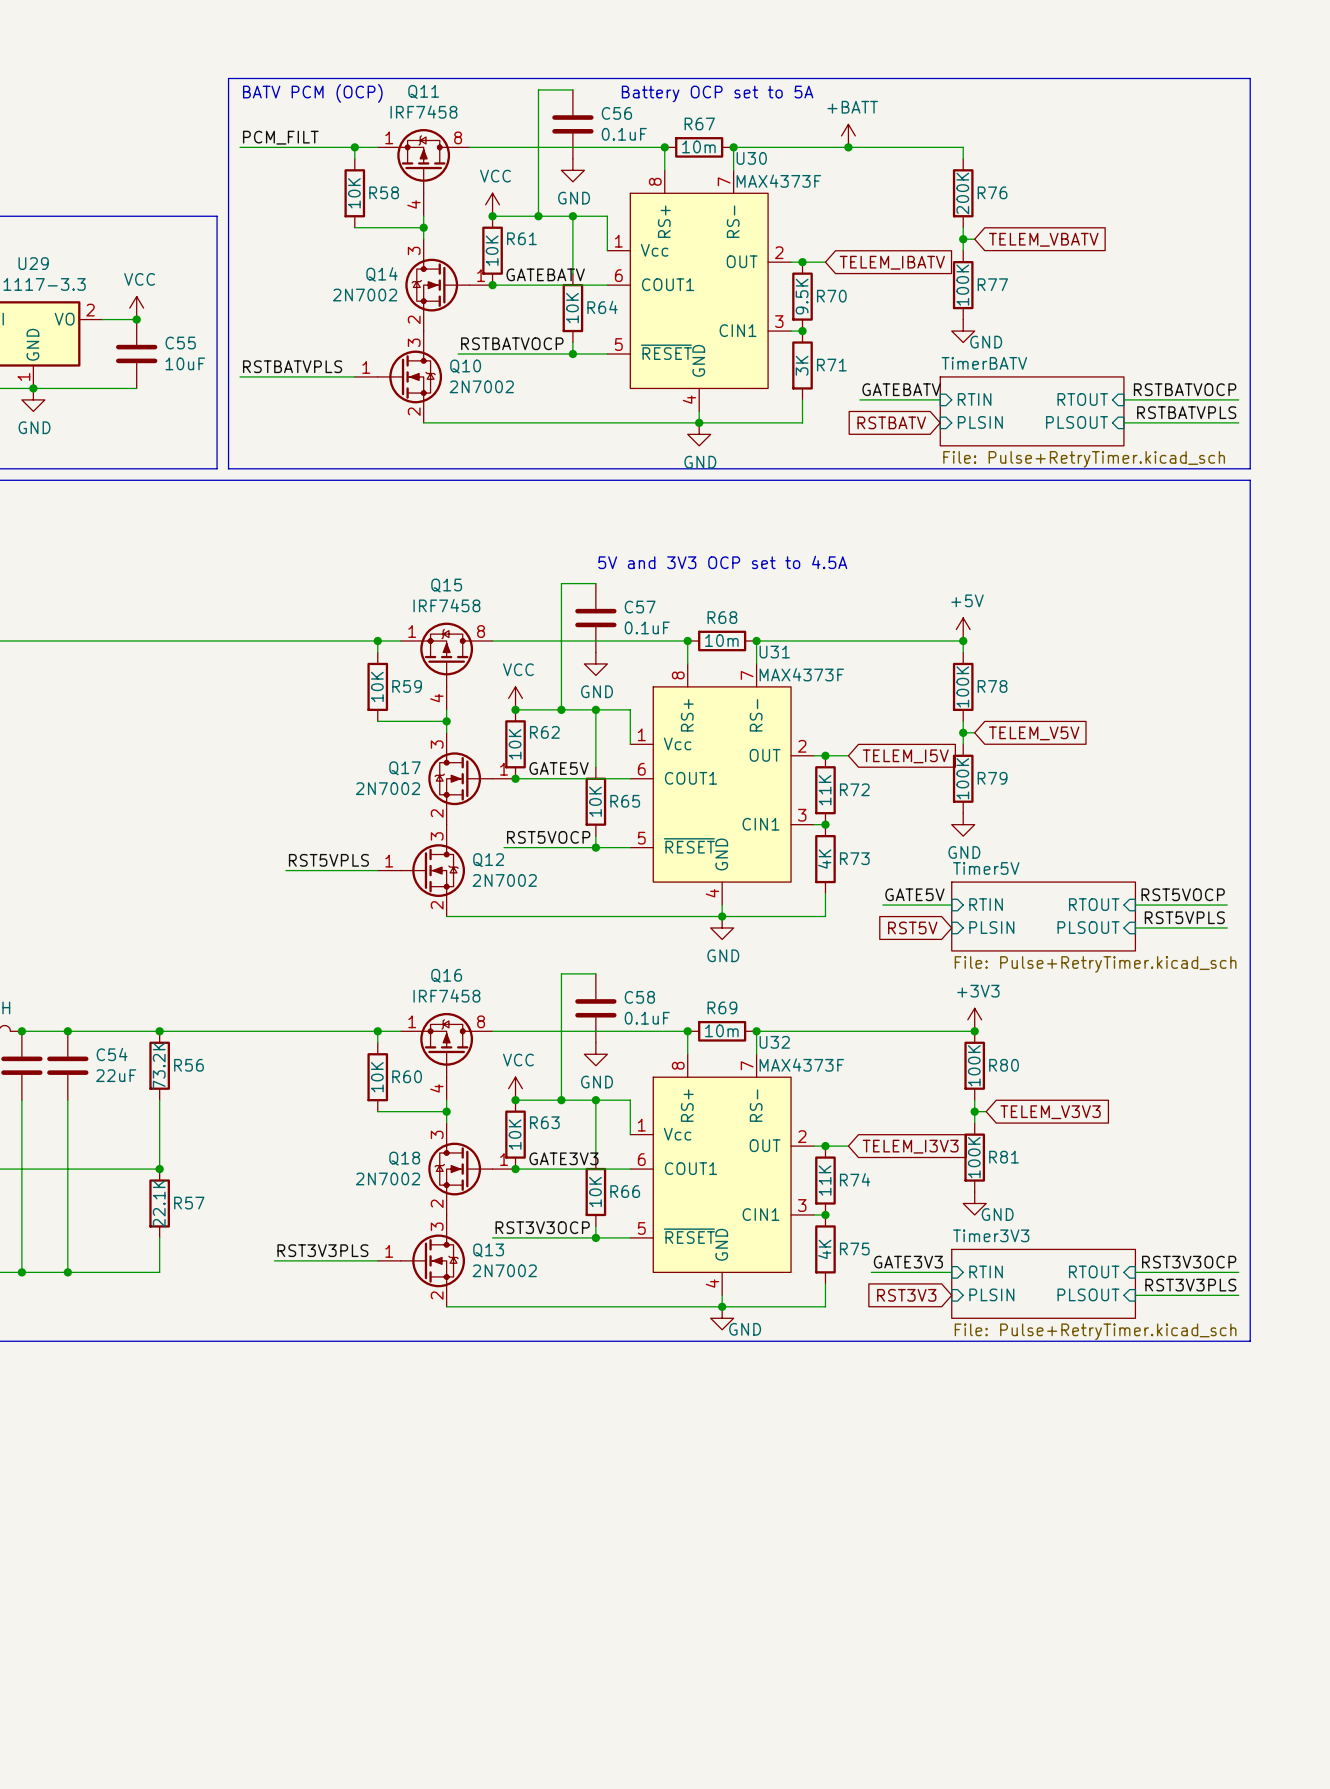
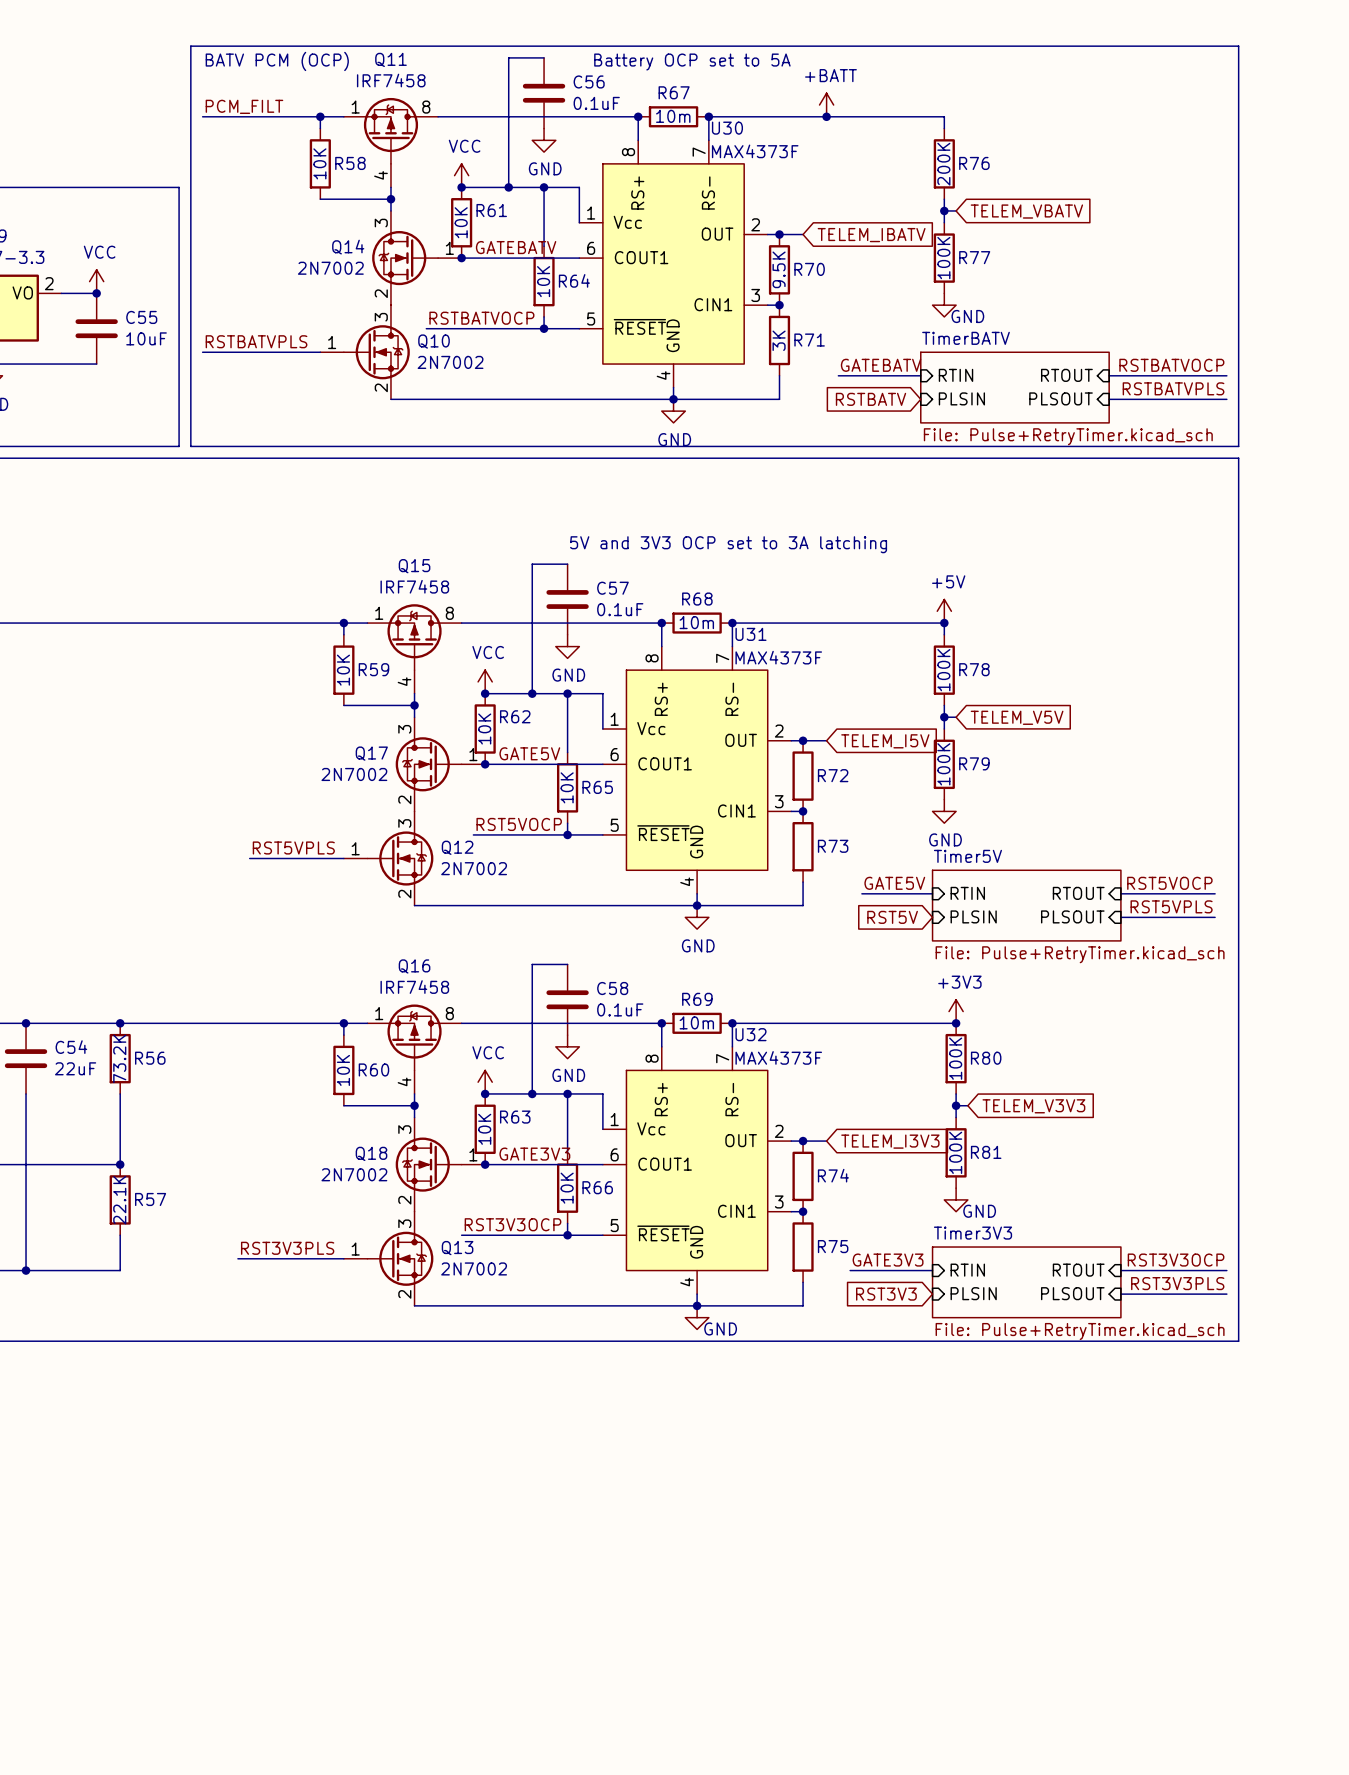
text: 5V and 3V3 OCP set to 4.5A (722, 562) -> 5V and 3V3 OCP set to 3A latching (728, 544)
R72 value: 11K (825, 790) -> none
R73 value: 4K (824, 859) -> none
R74 value: 11K (825, 1180) -> none
R75 value: 4K (824, 1249) -> none

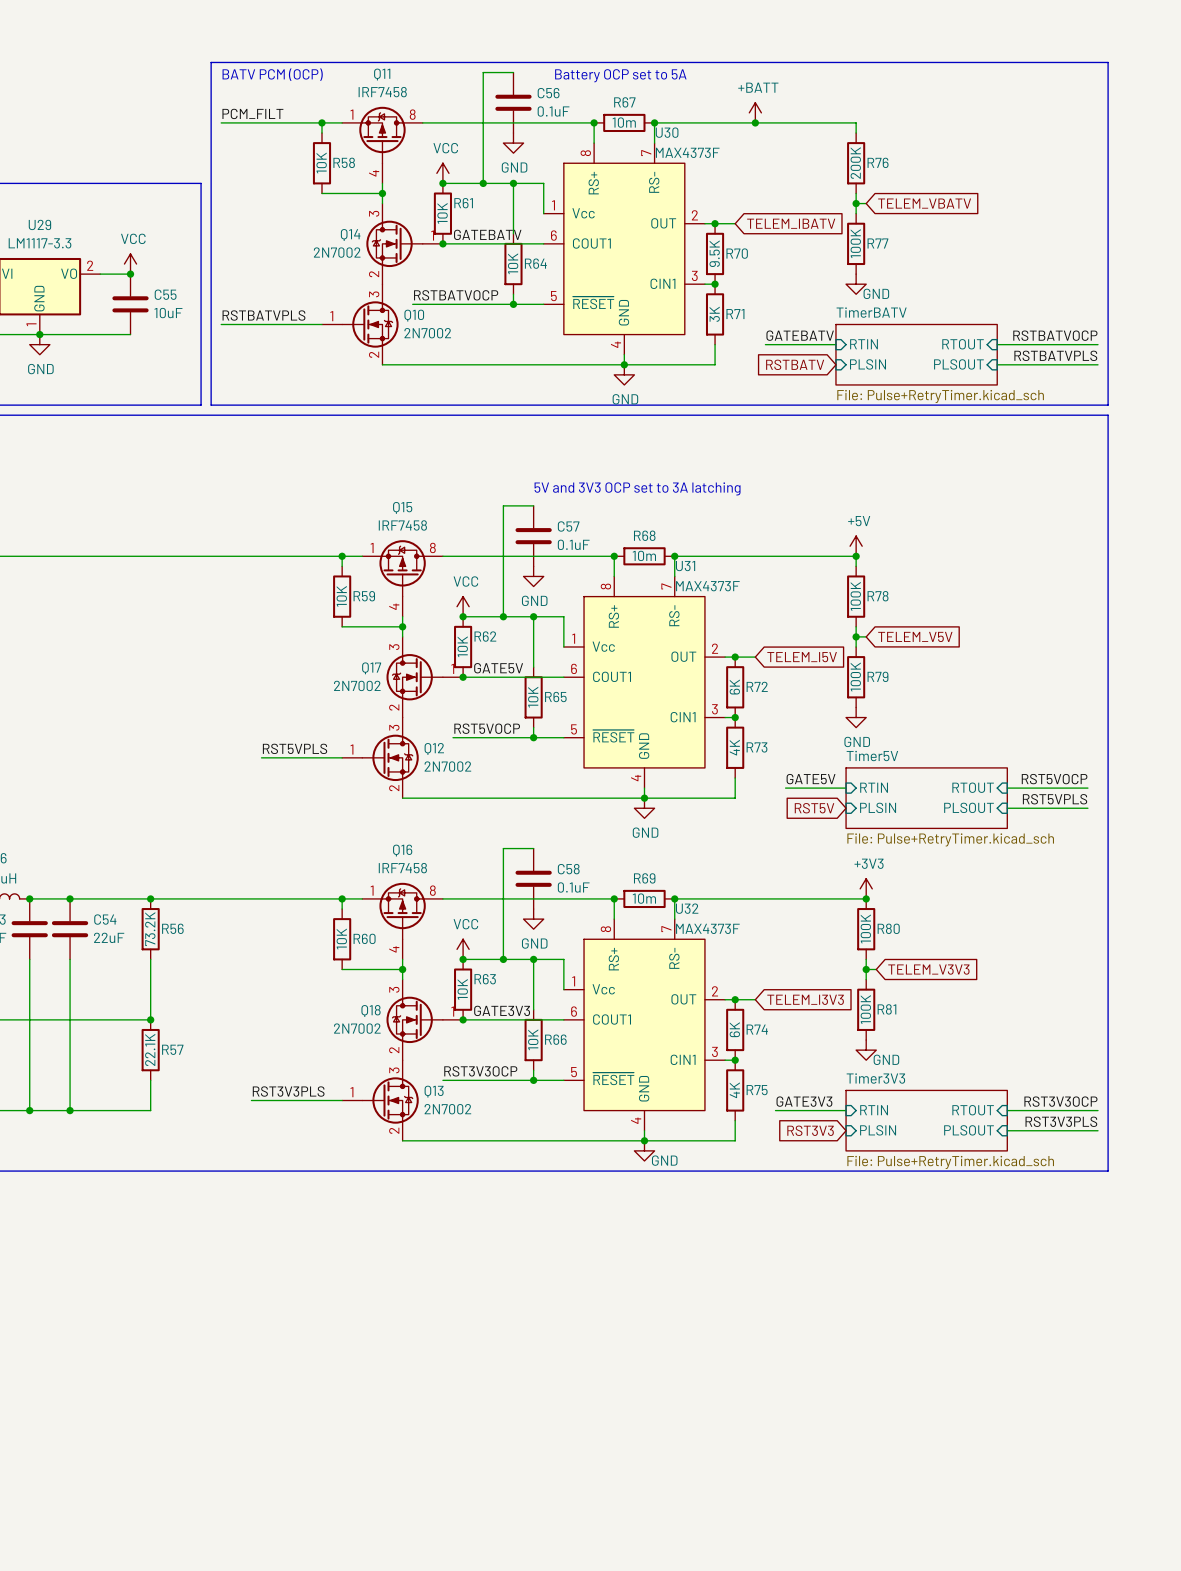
R72 value: none -> 6K (734, 687)
R73 value: none -> 4K (734, 747)
R74 value: none -> 6K (734, 1029)
R75 value: none -> 4K (734, 1090)

